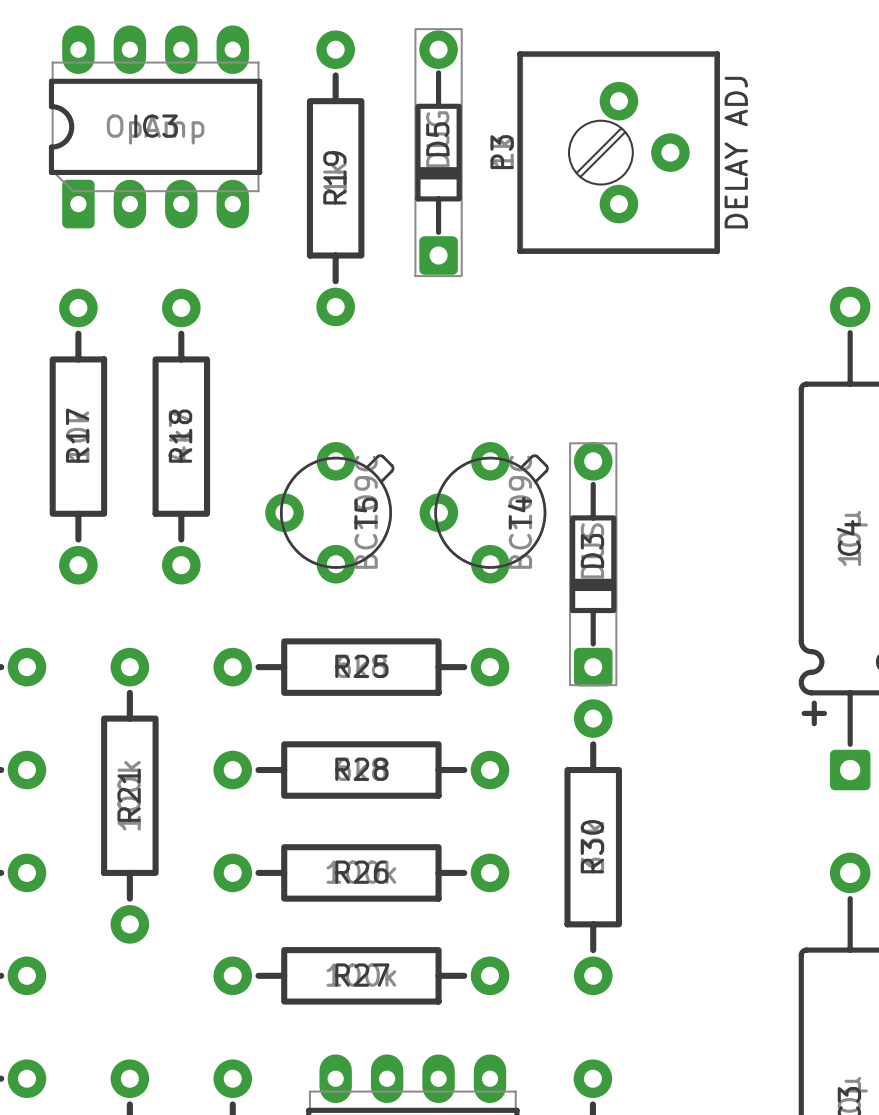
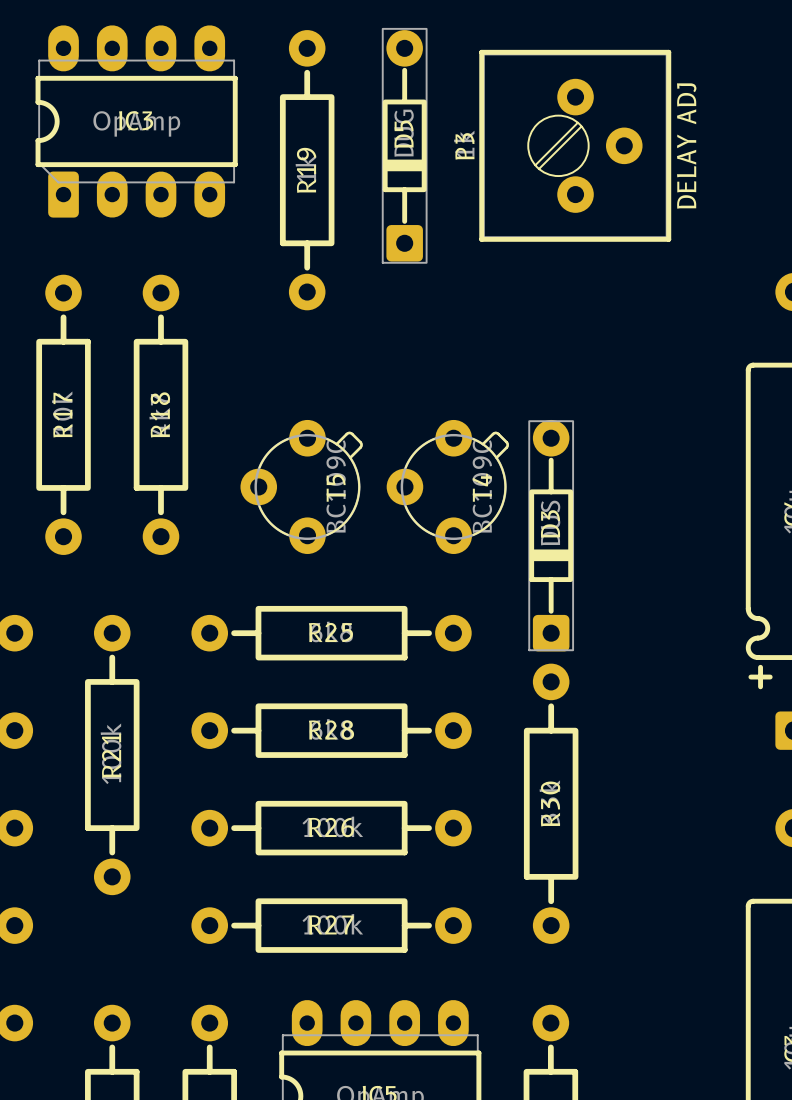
T5 footprint: [265, 442, 395, 584] -> [240, 419, 363, 554]
T4 footprint: [419, 442, 549, 584] -> [386, 419, 509, 554]

